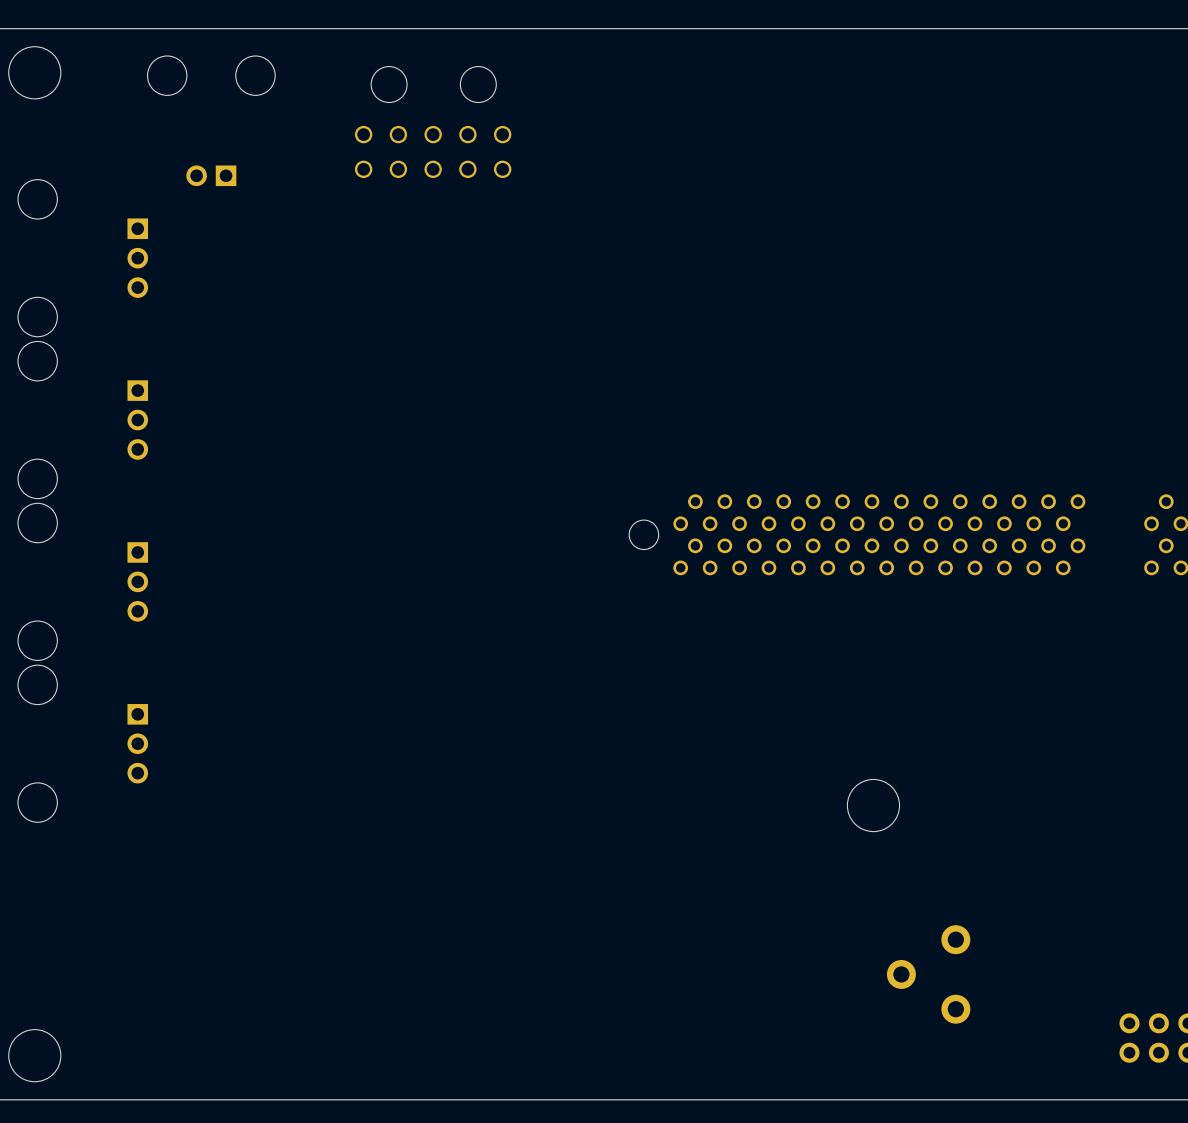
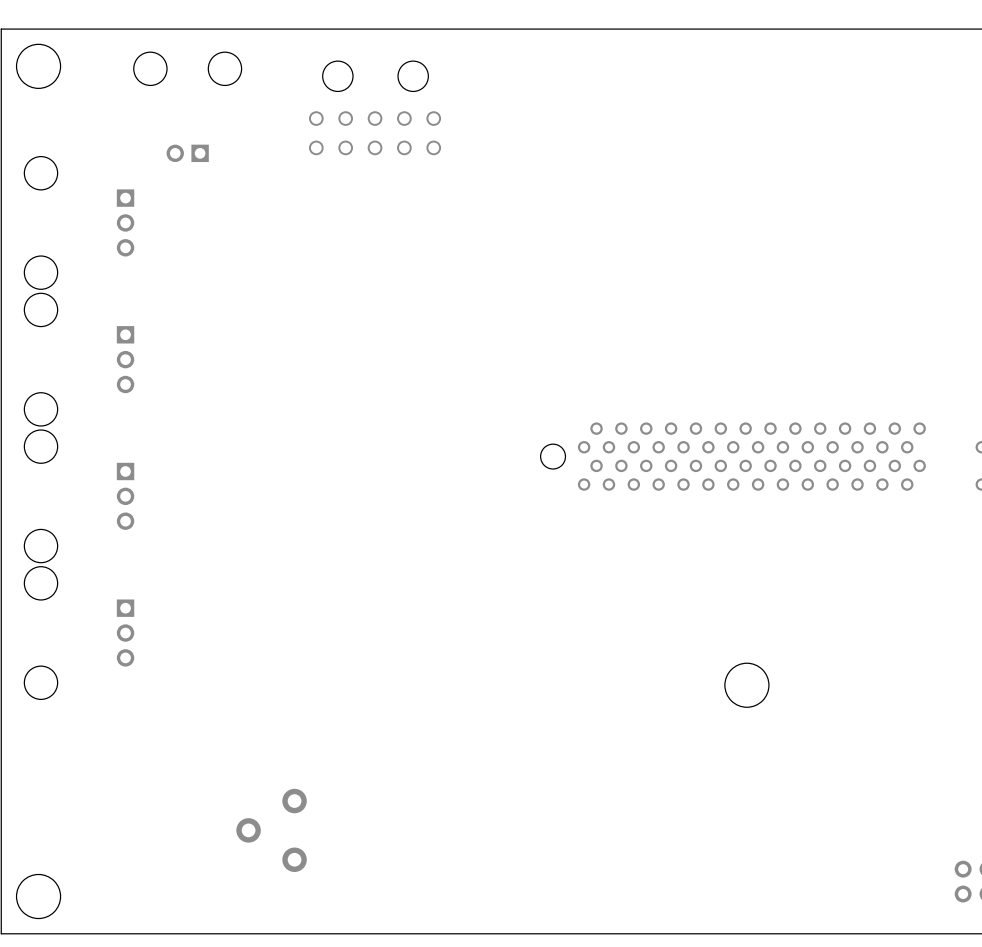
part: (928, 974) -> none
part: none -> (271, 830)

